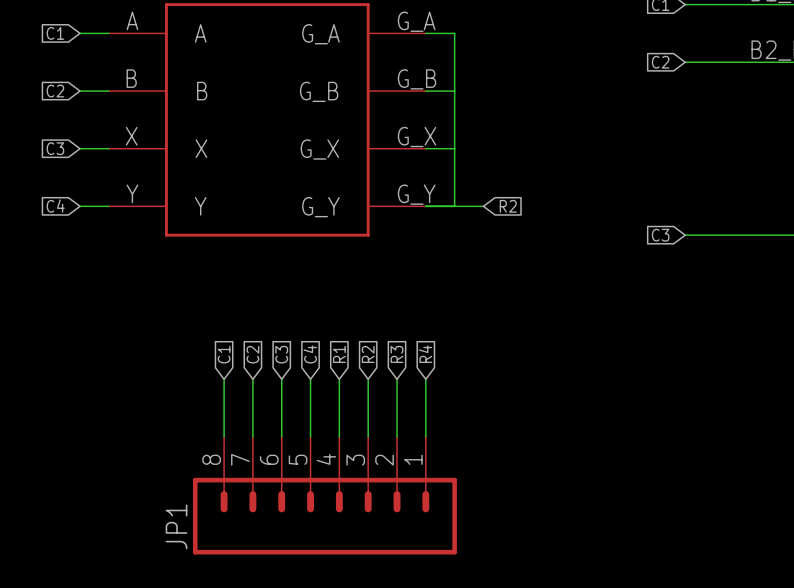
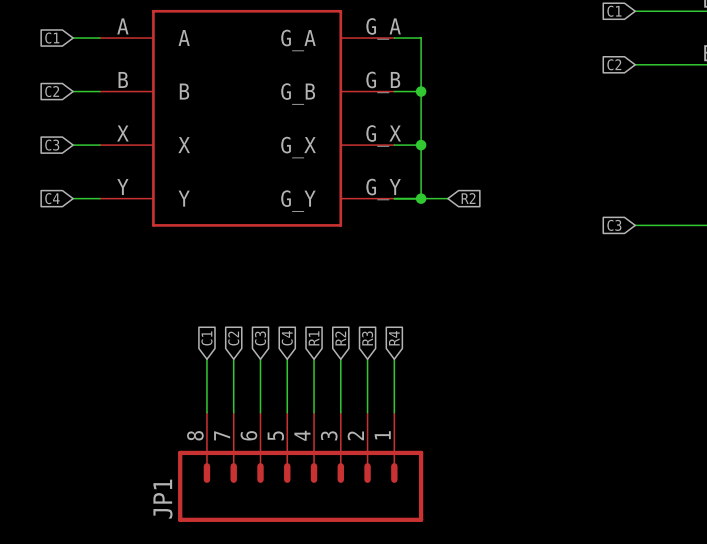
junction: none -> (421, 91)
junction: none -> (421, 145)
junction: none -> (421, 198)

